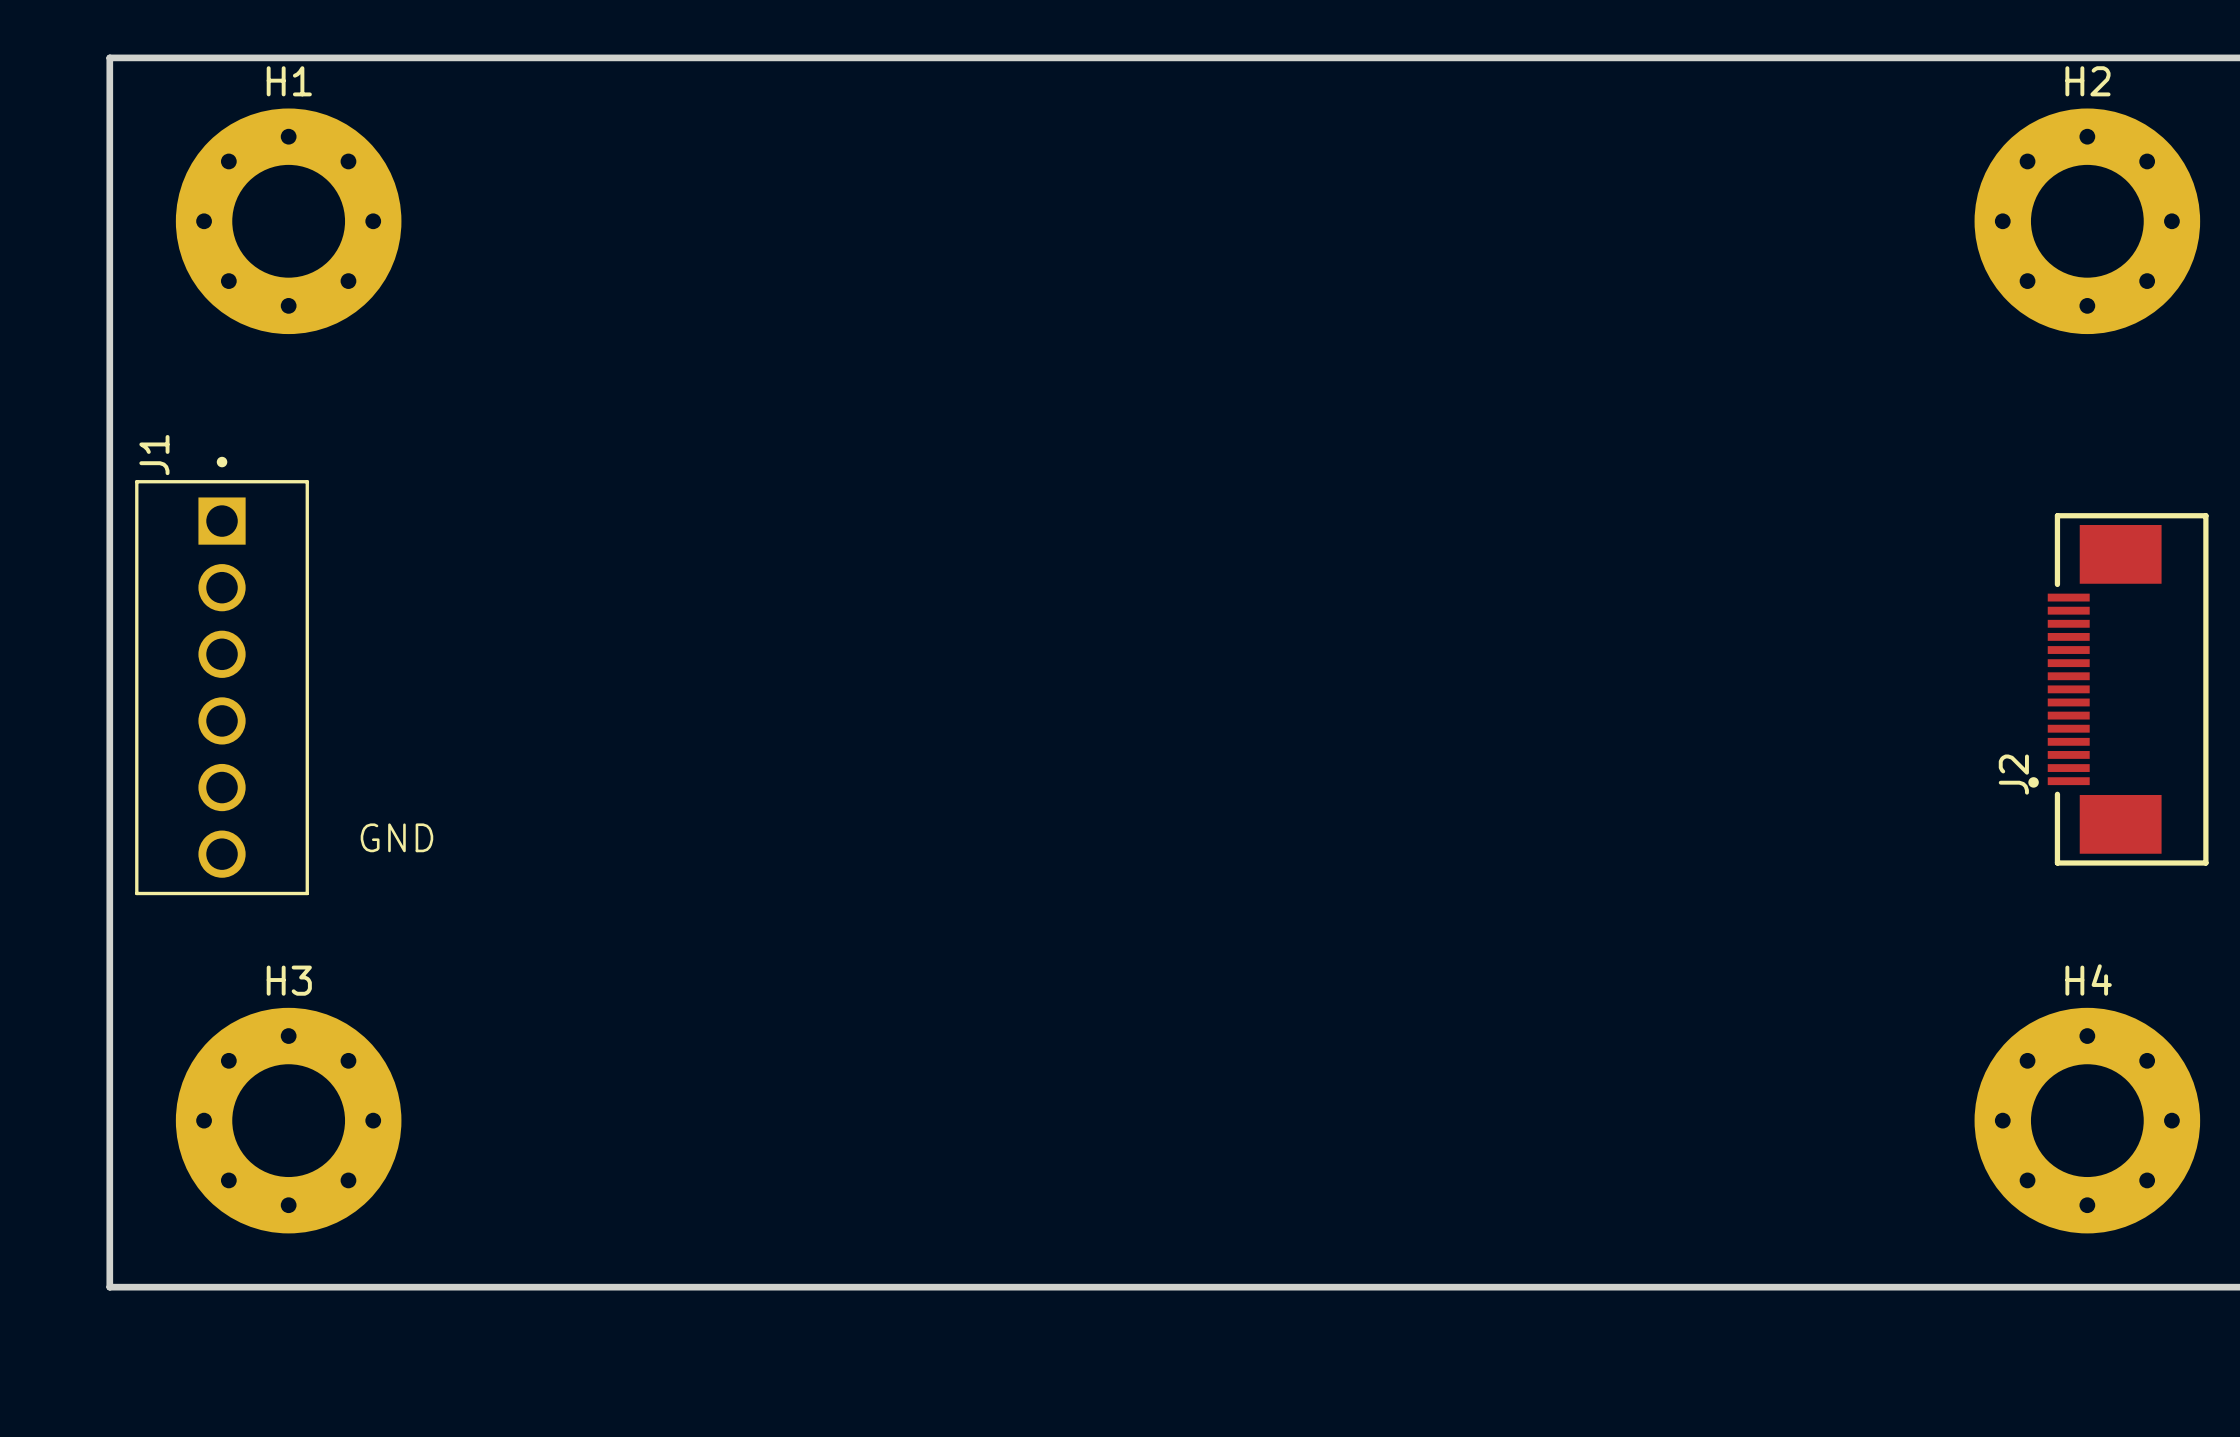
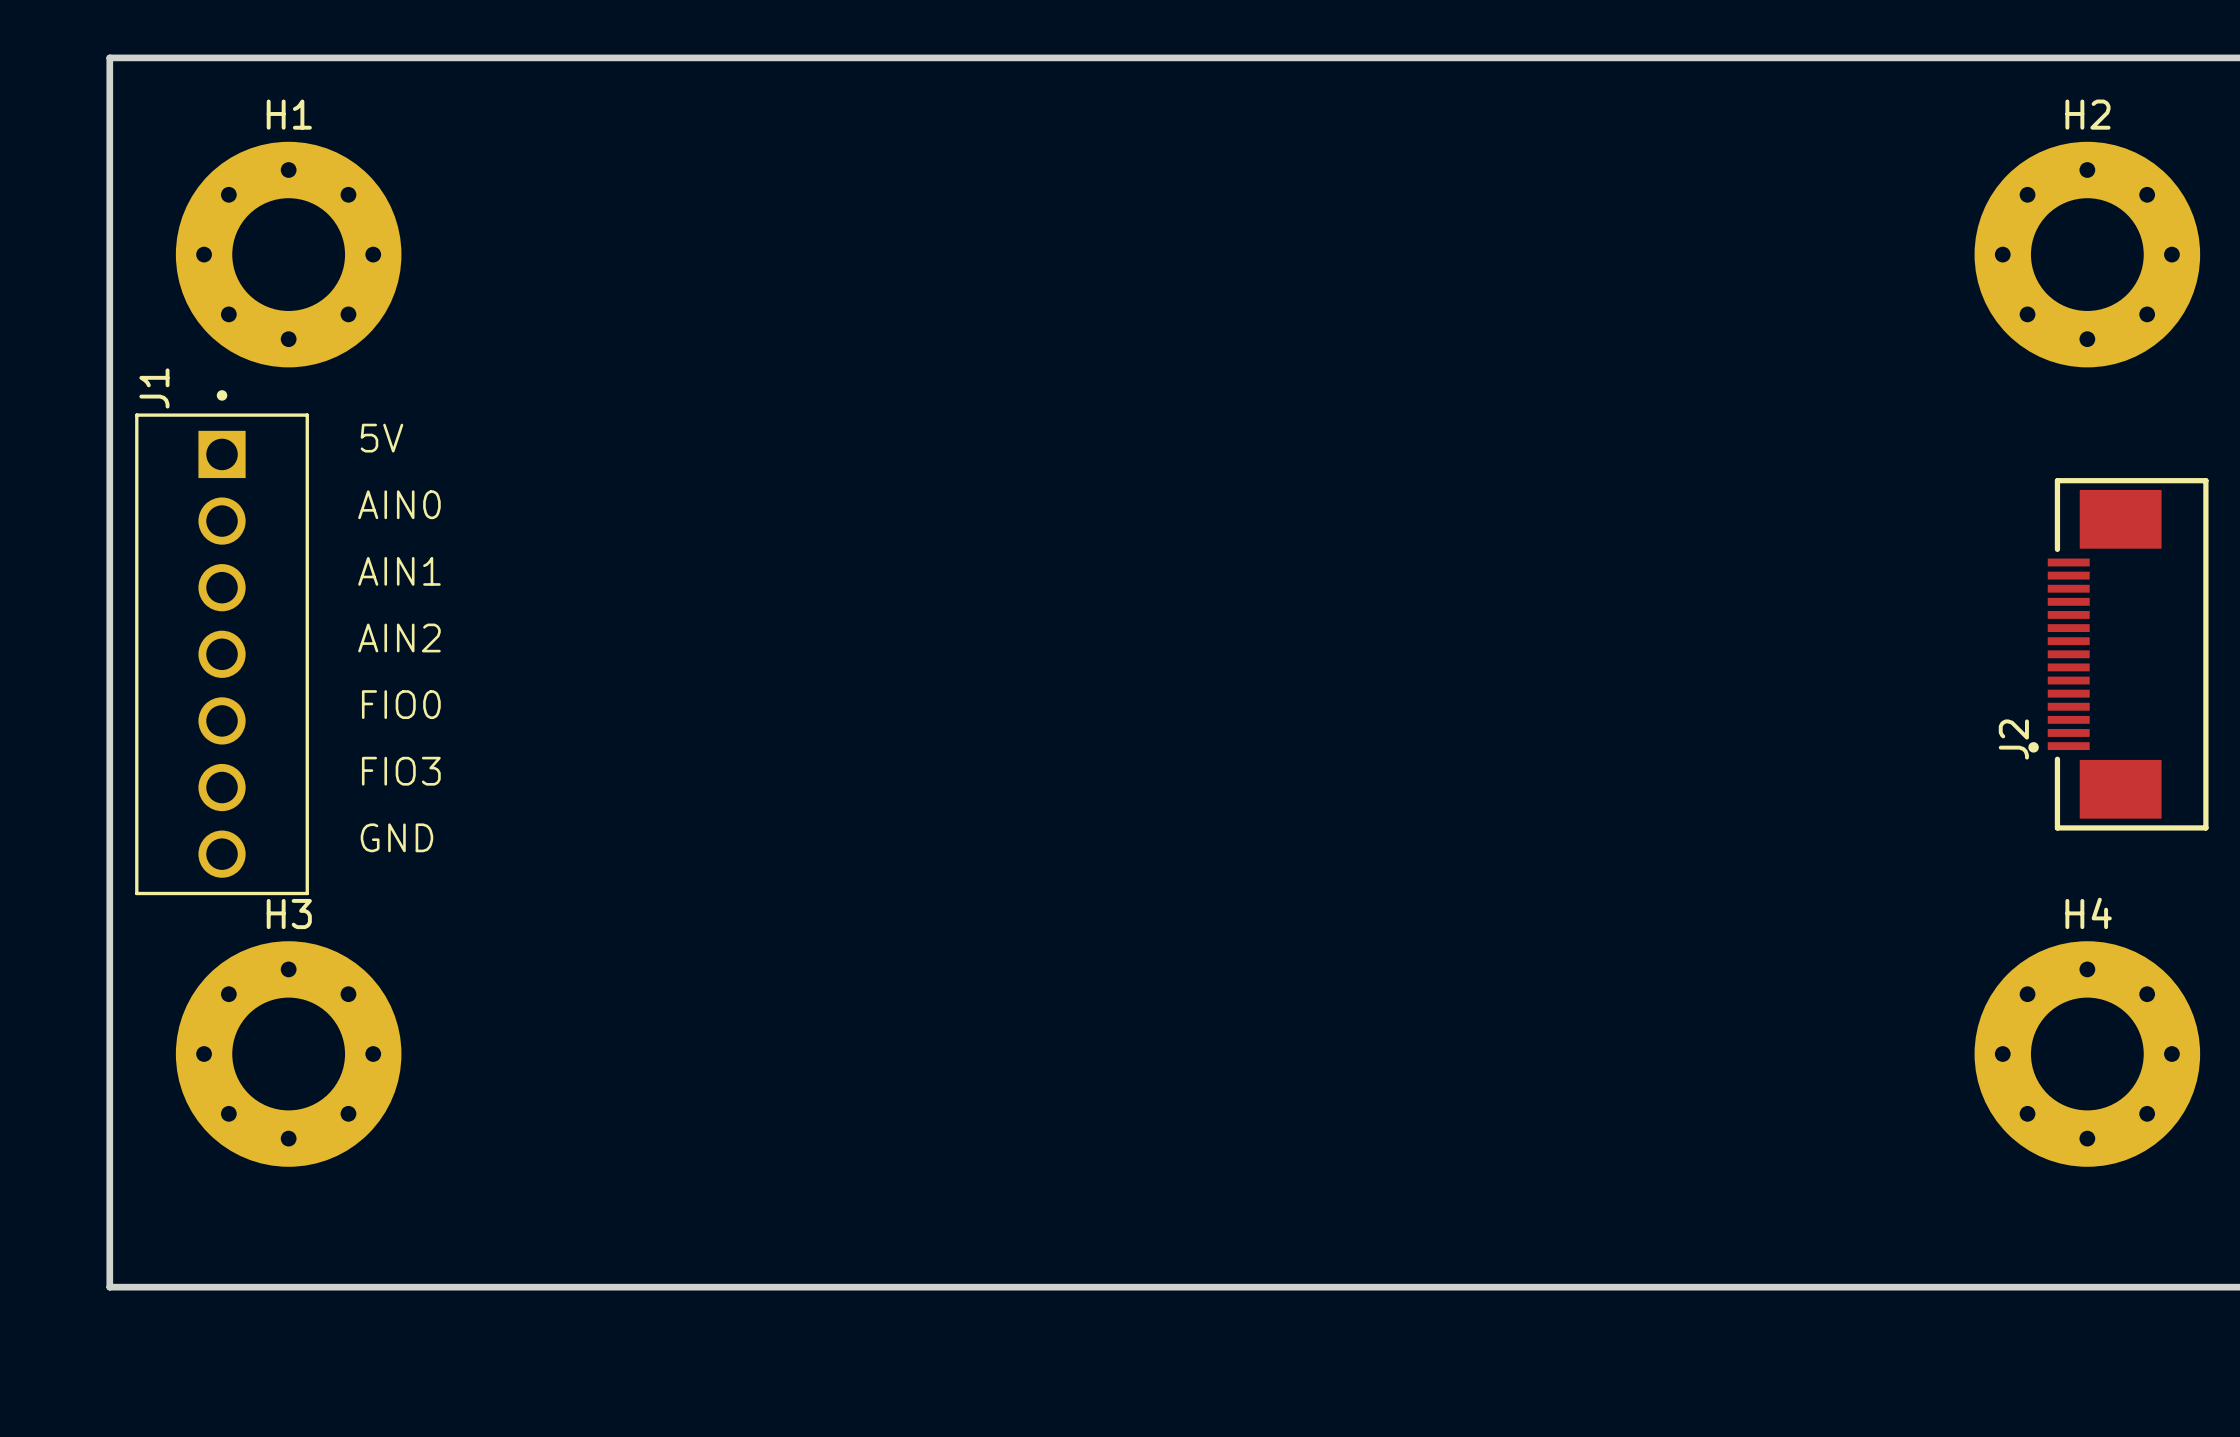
H1 position: (288, 221) -> (288, 254)
H2 position: (2087, 221) -> (2087, 254)
text: none -> 5V (381, 438)
J1 footprint: [135, 456, 309, 896] -> [135, 390, 309, 896]
text: none -> AIN0 (399, 504)
text: none -> AIN1 (399, 571)
text: none -> AIN2 (399, 637)
J2 position: (2118, 689) -> (2118, 654)
text: none -> FIO0 (401, 704)
text: none -> FIO3 (401, 771)
H3 position: (288, 1120) -> (288, 1054)
H4 position: (2087, 1120) -> (2087, 1054)

